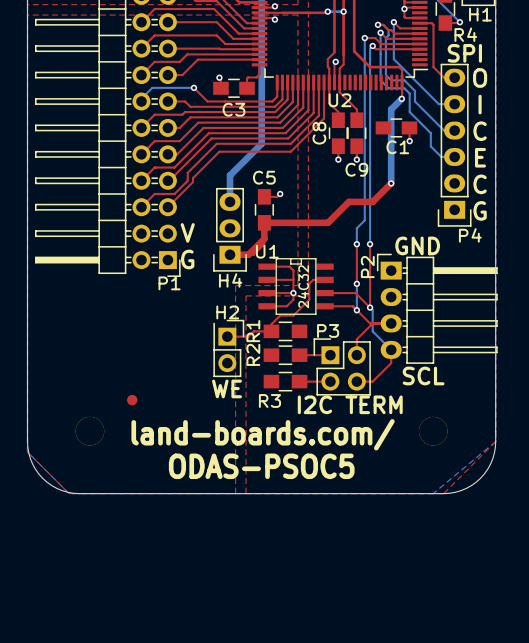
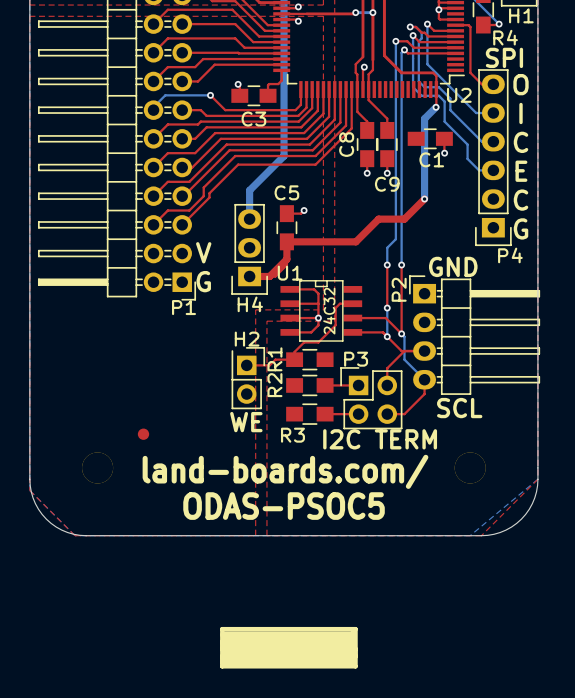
U2 name position: U2 (339, 100) -> U2 (459, 95)
drawing: none -> [220, 626, 358, 669]

